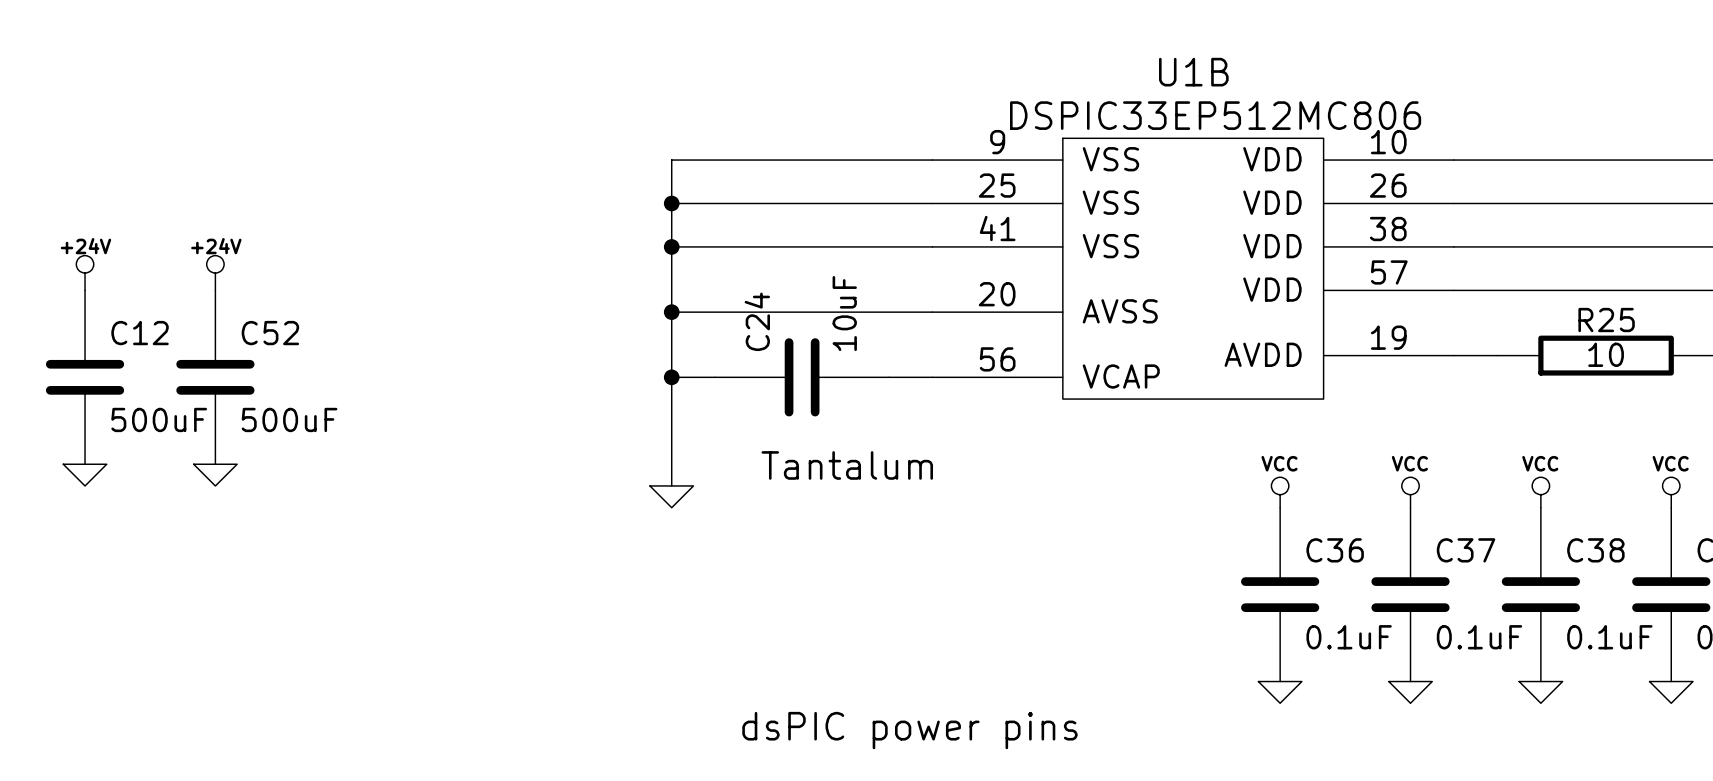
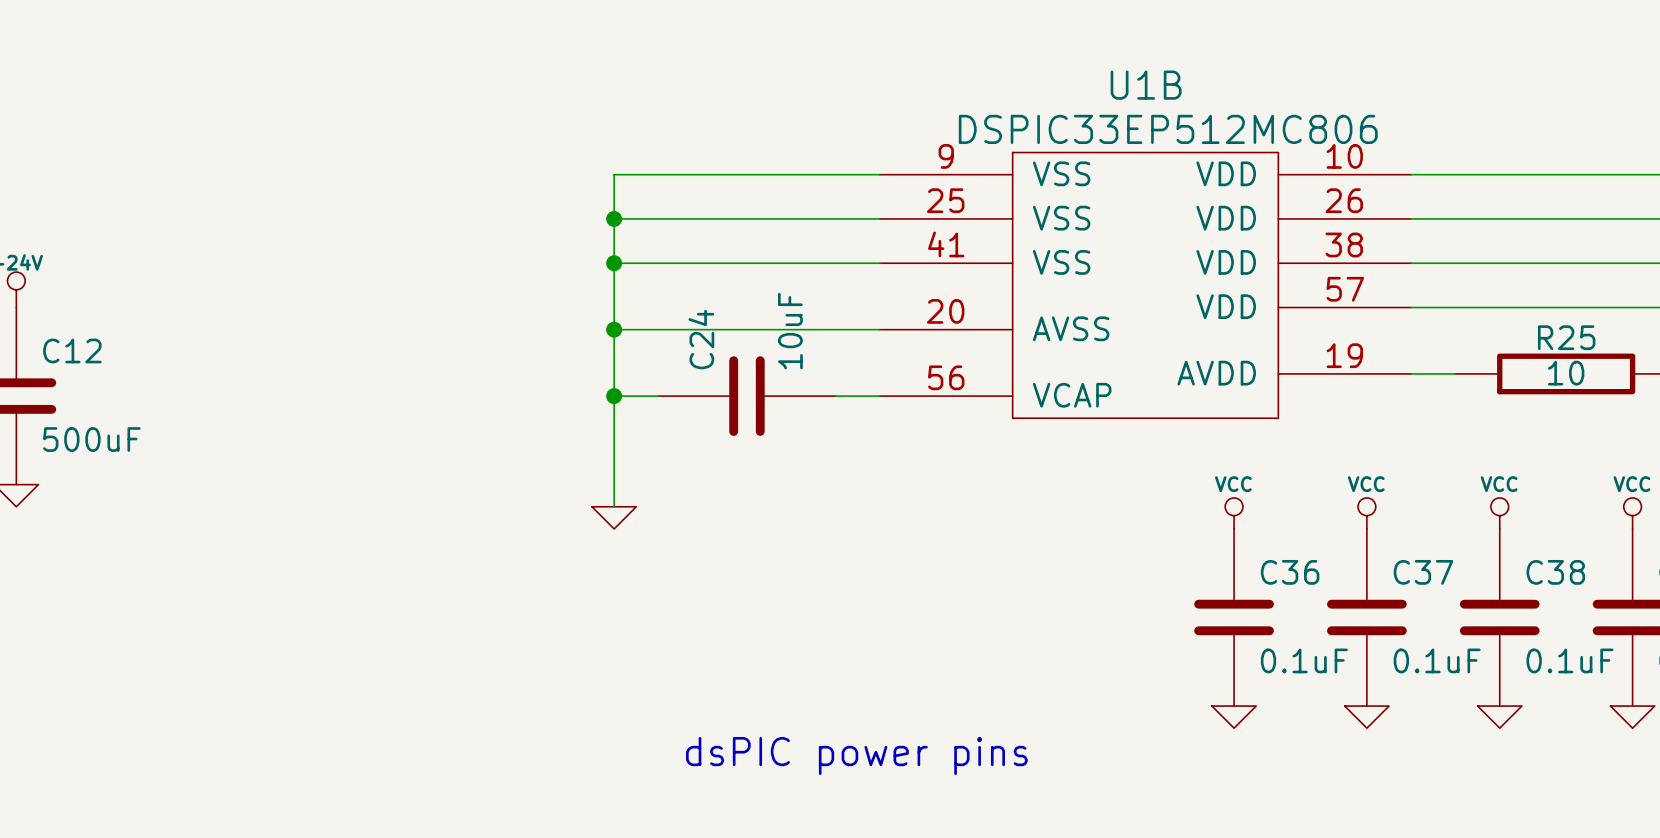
power symbol: +24V (215, 273) -> none
C52: 500uF (215, 377) -> none
text: Tantalum (847, 465) -> none
power symbol: (215, 475) -> none

